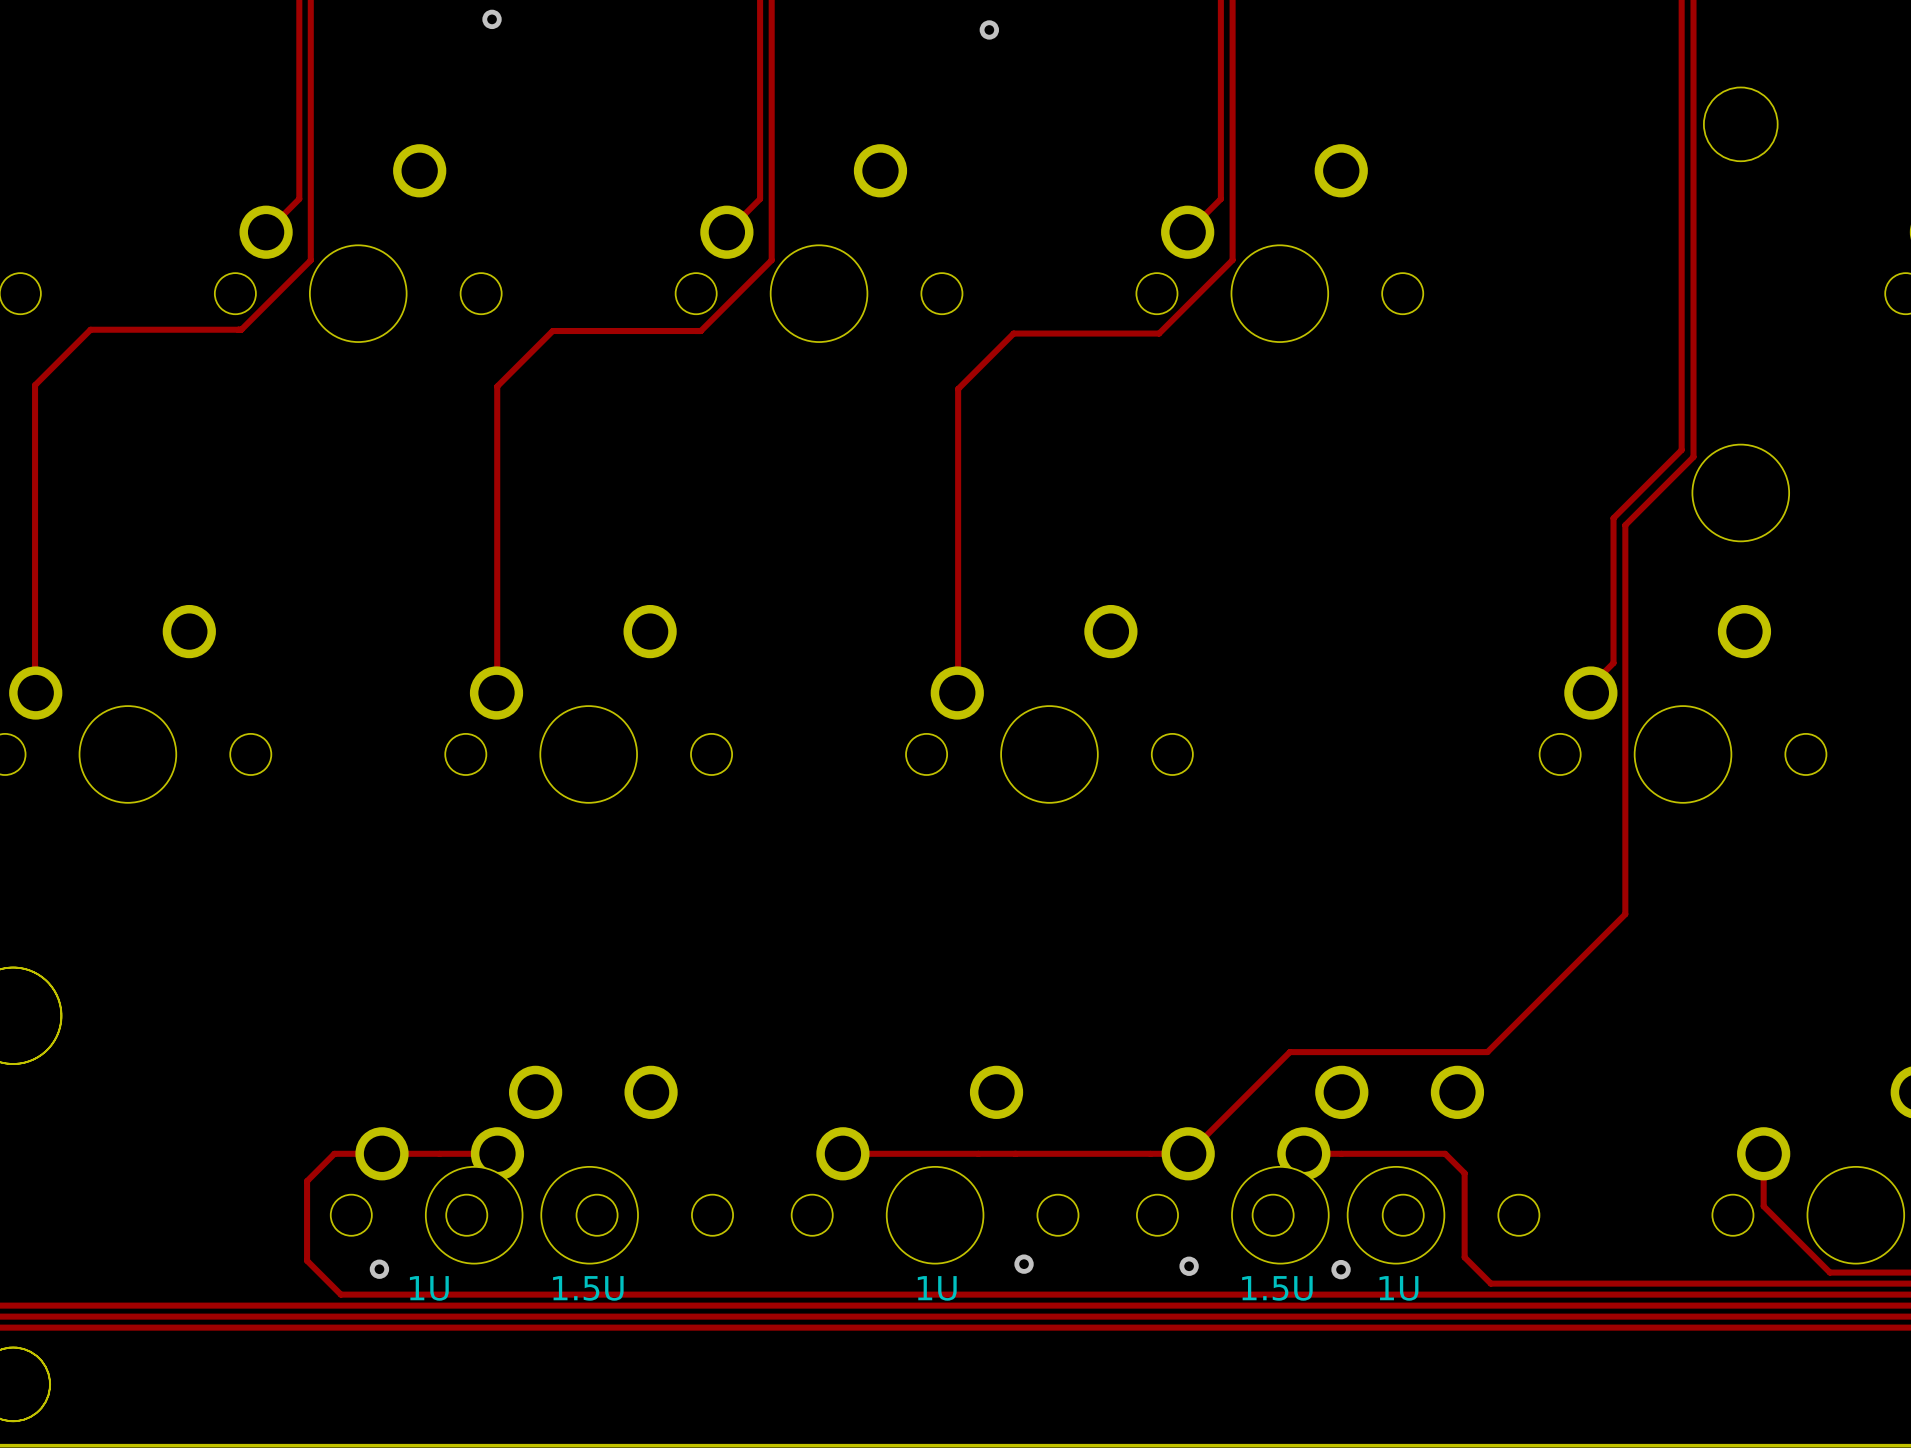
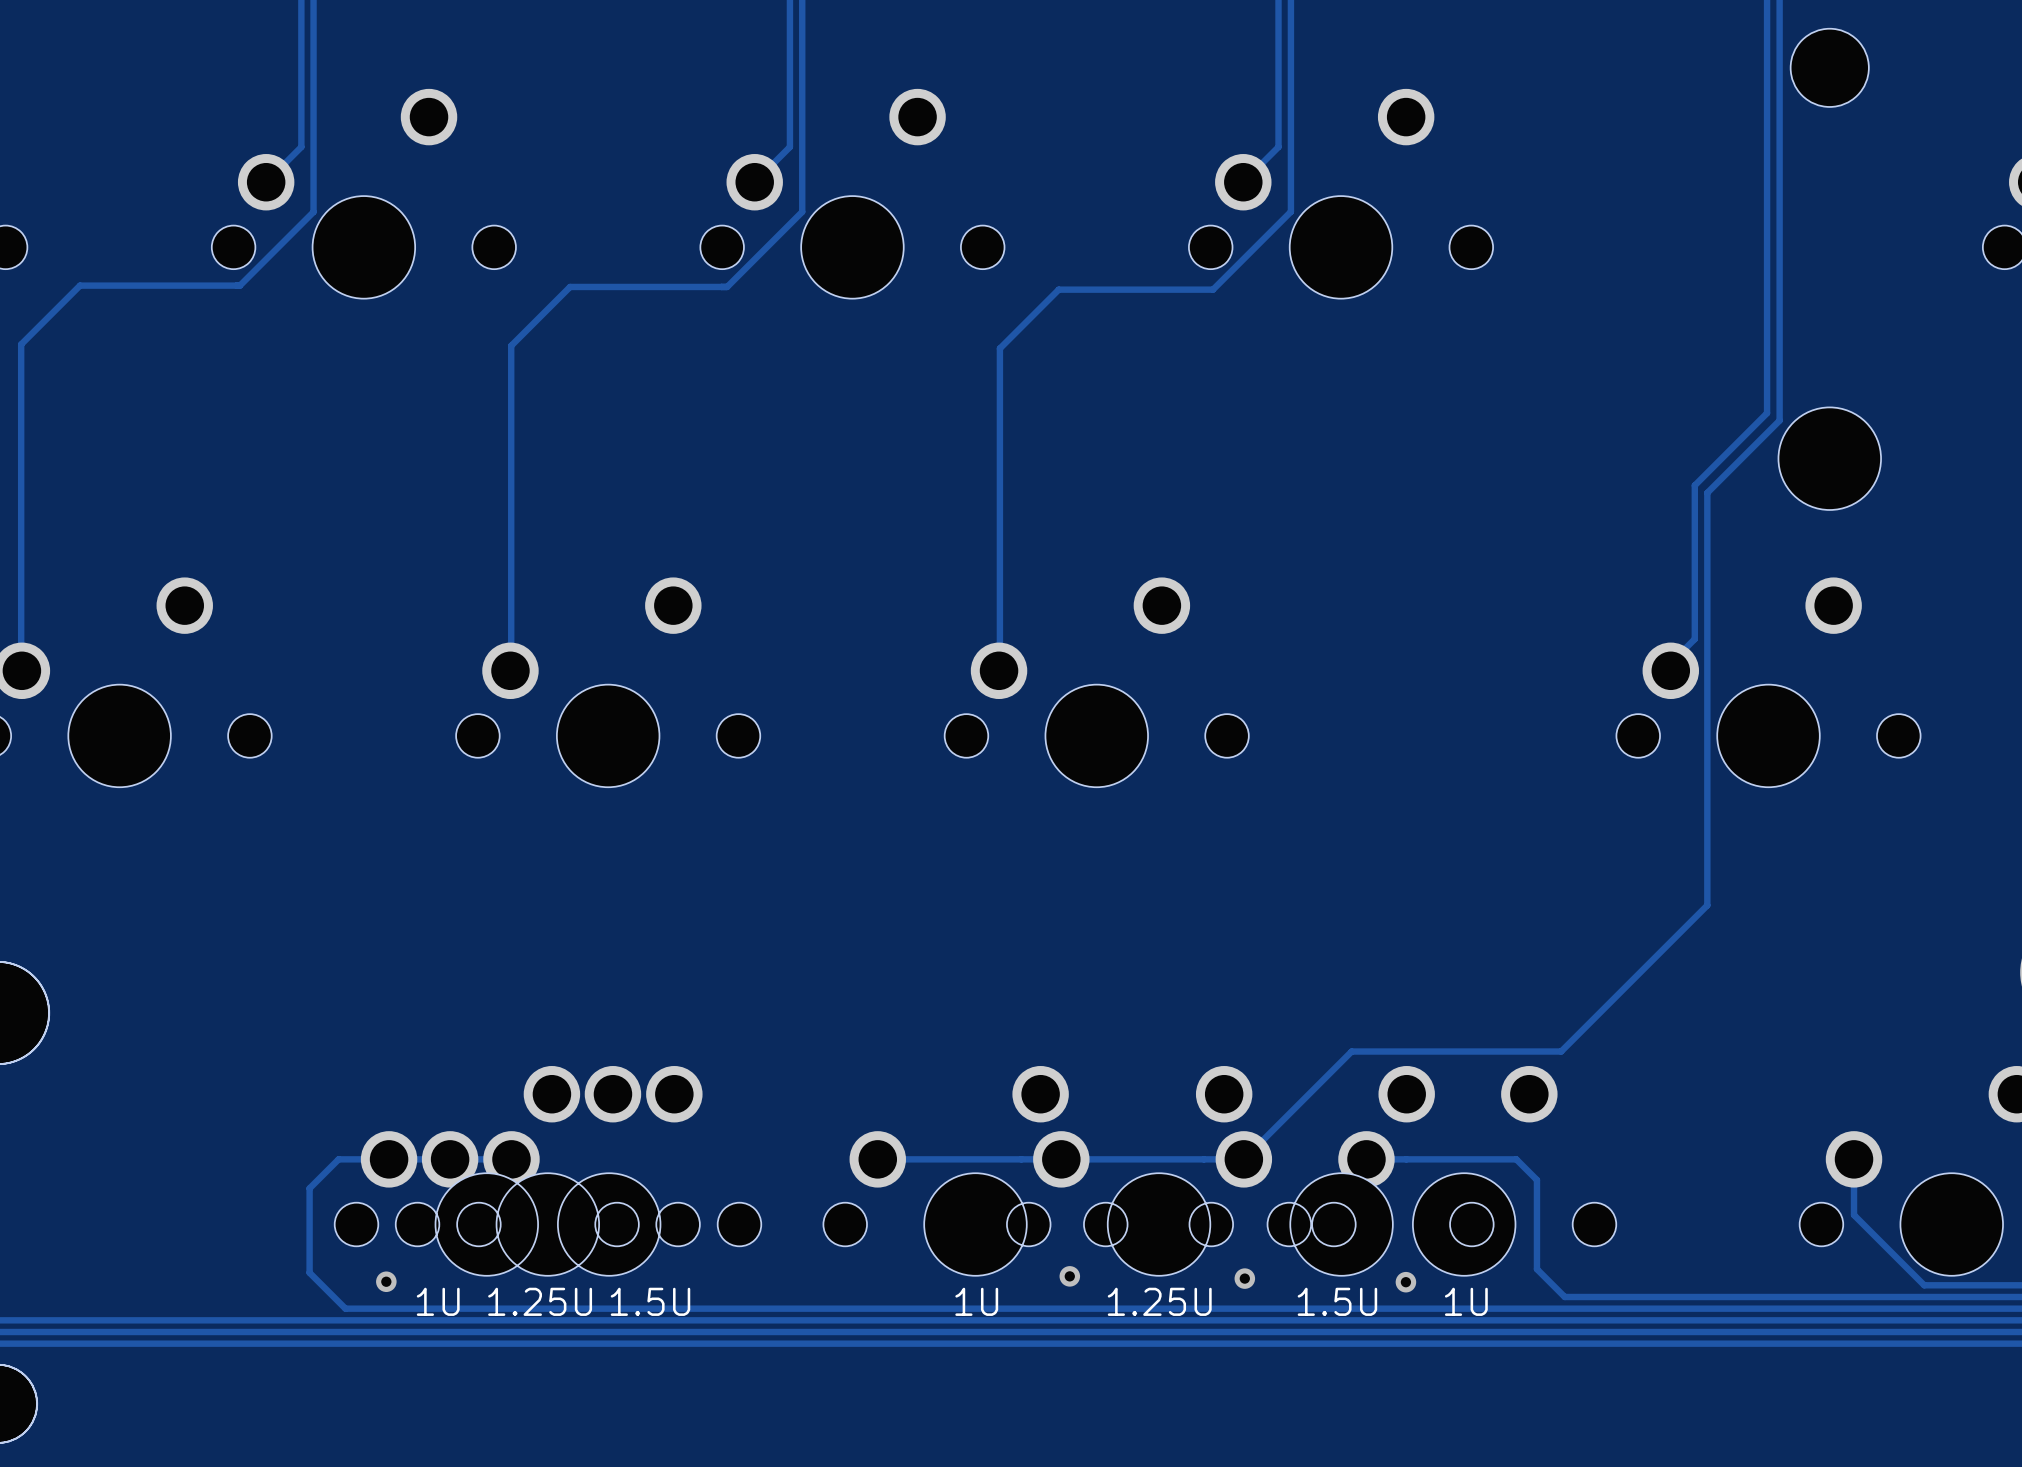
part: none -> (547, 1170)
part: none -> (1159, 1170)
text: none -> 1.25U (540, 1301)
text position: 1.5U (588, 1288) -> 1.5U (650, 1301)
text: none -> 1.25U (1159, 1301)

